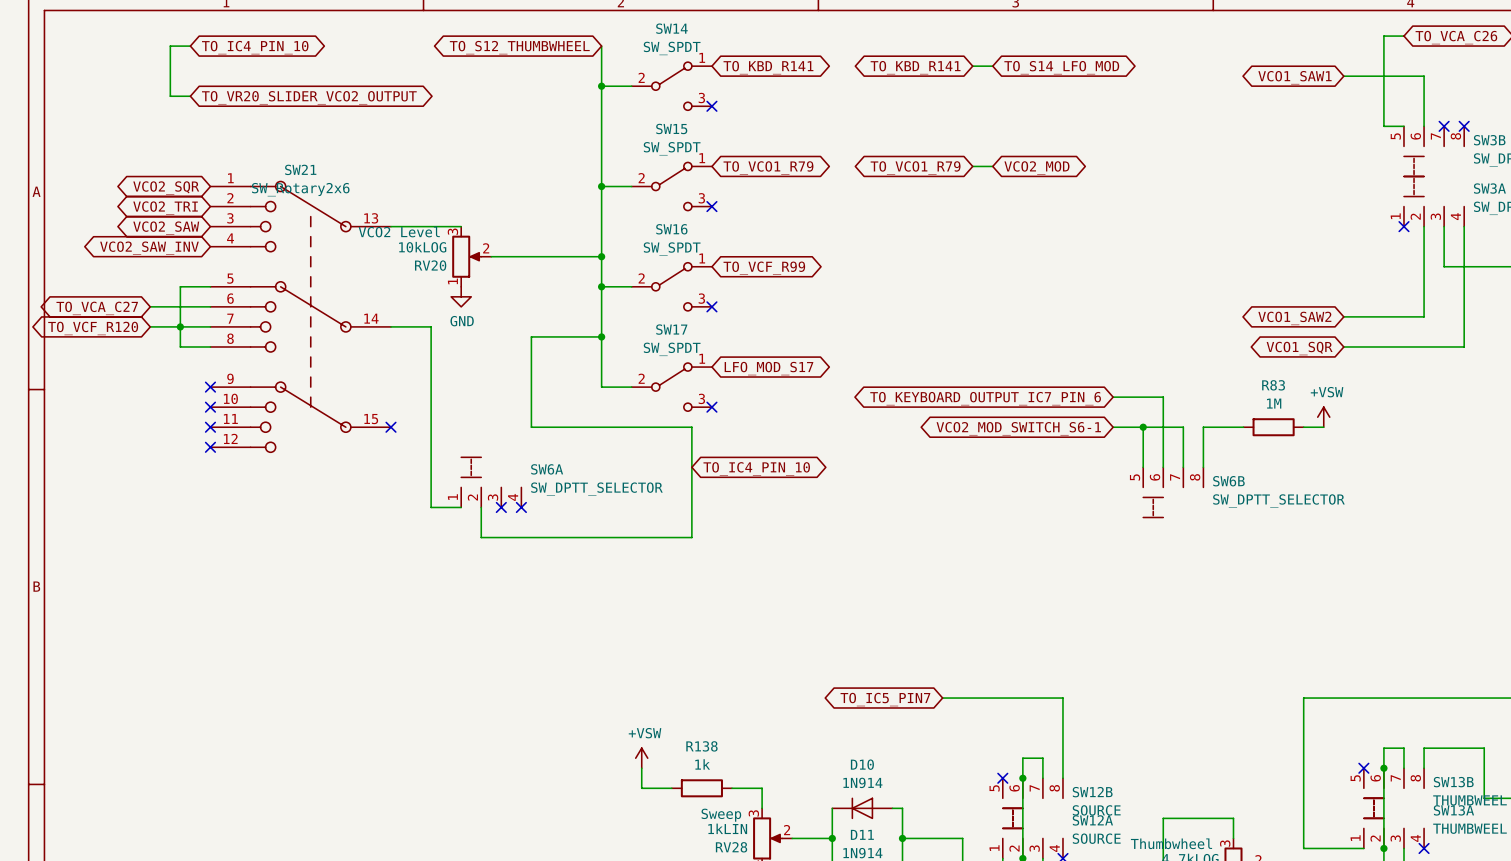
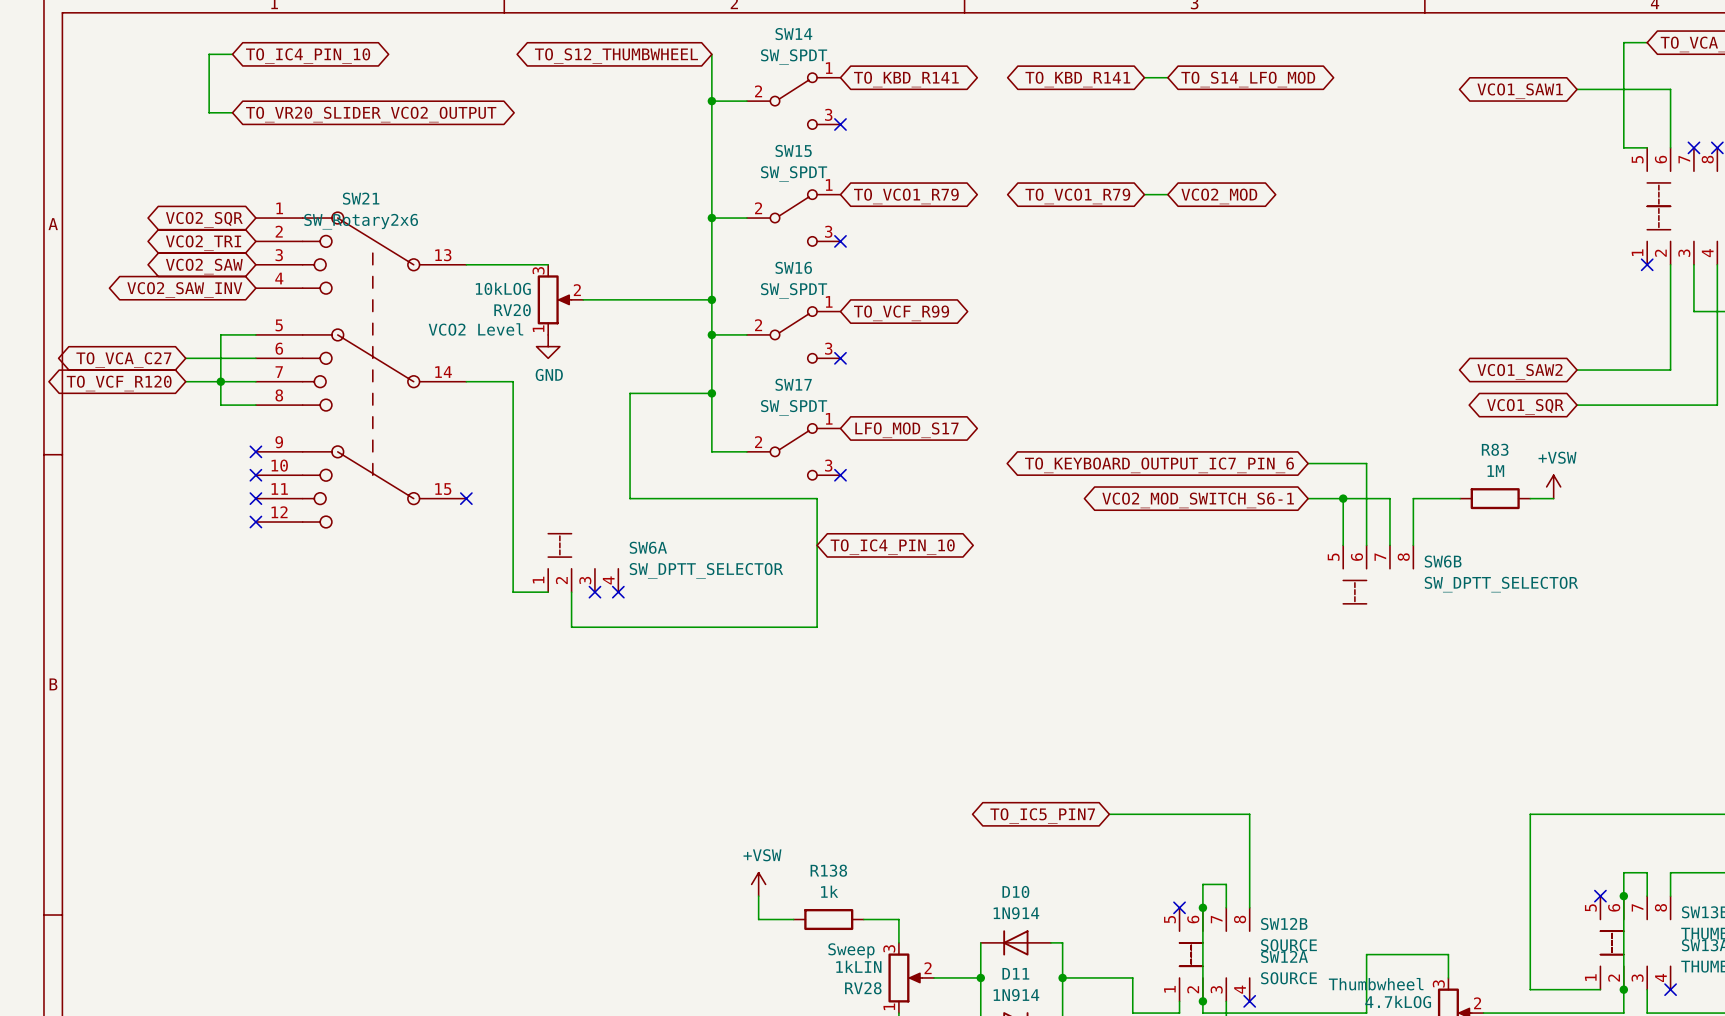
RV20 text position: VCO2 Level (399, 231) -> VCO2 Level (475, 329)

